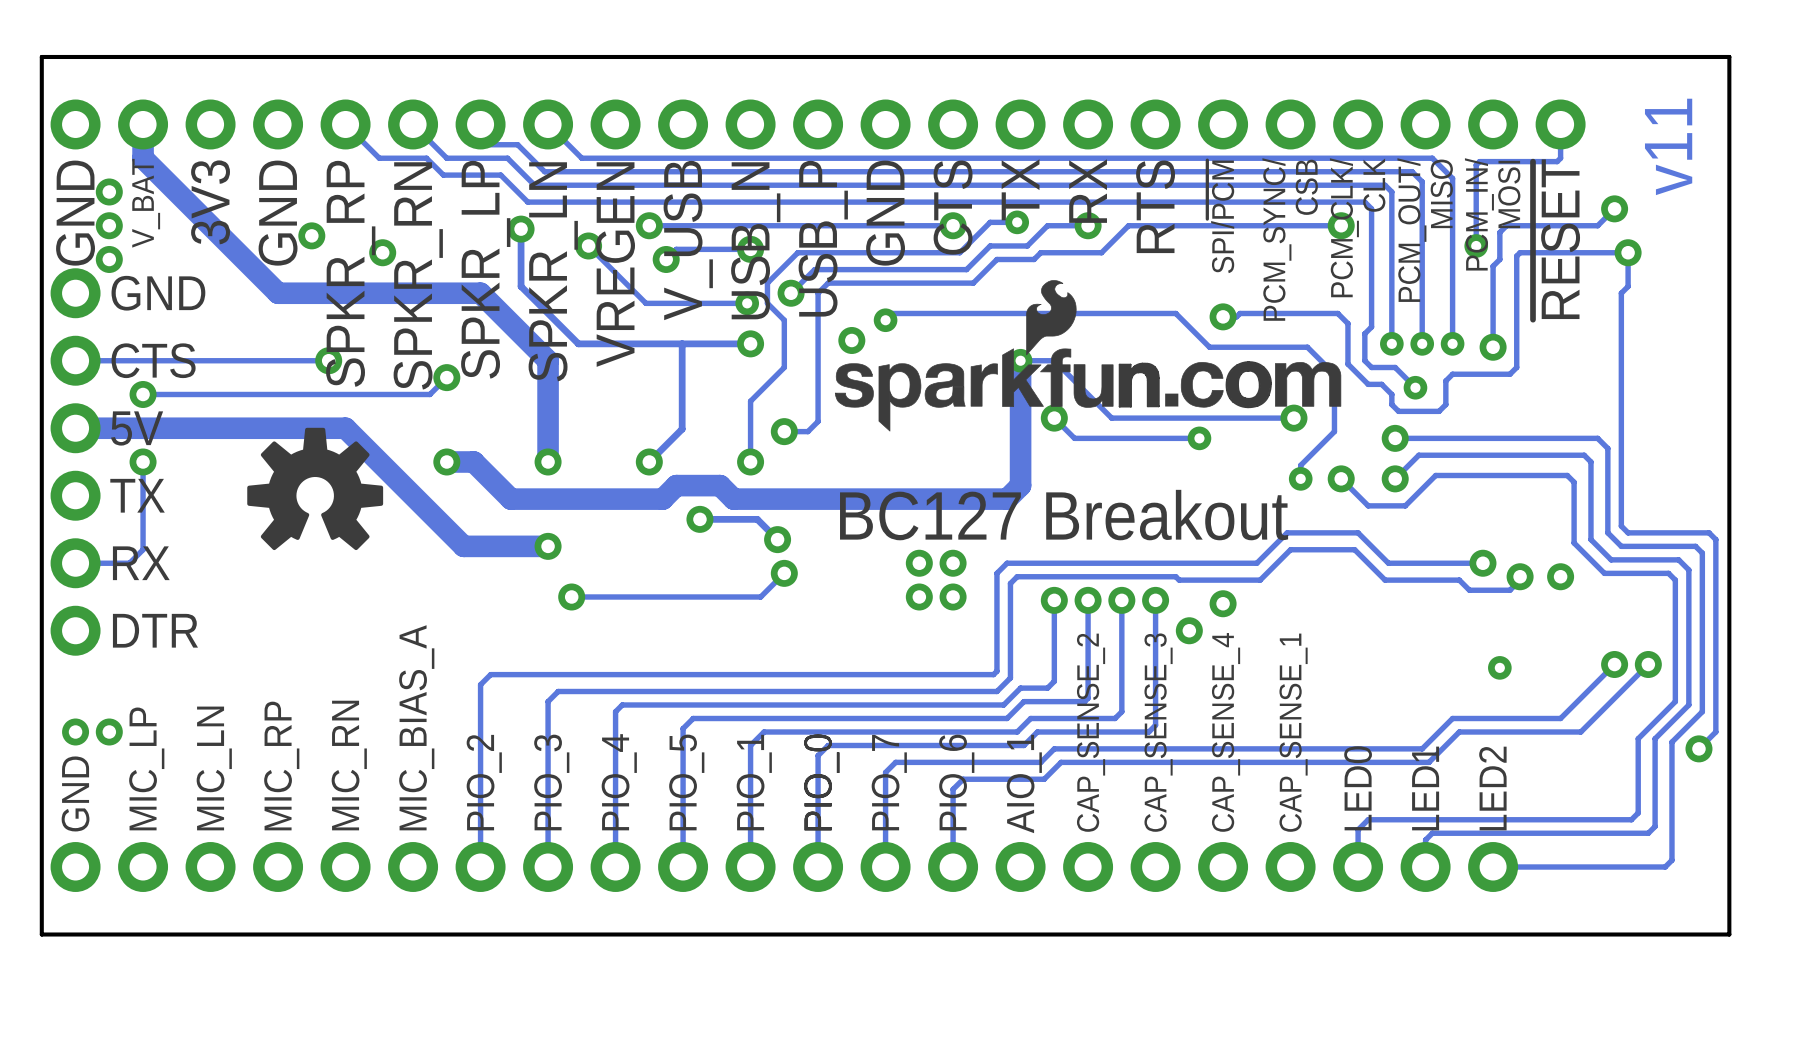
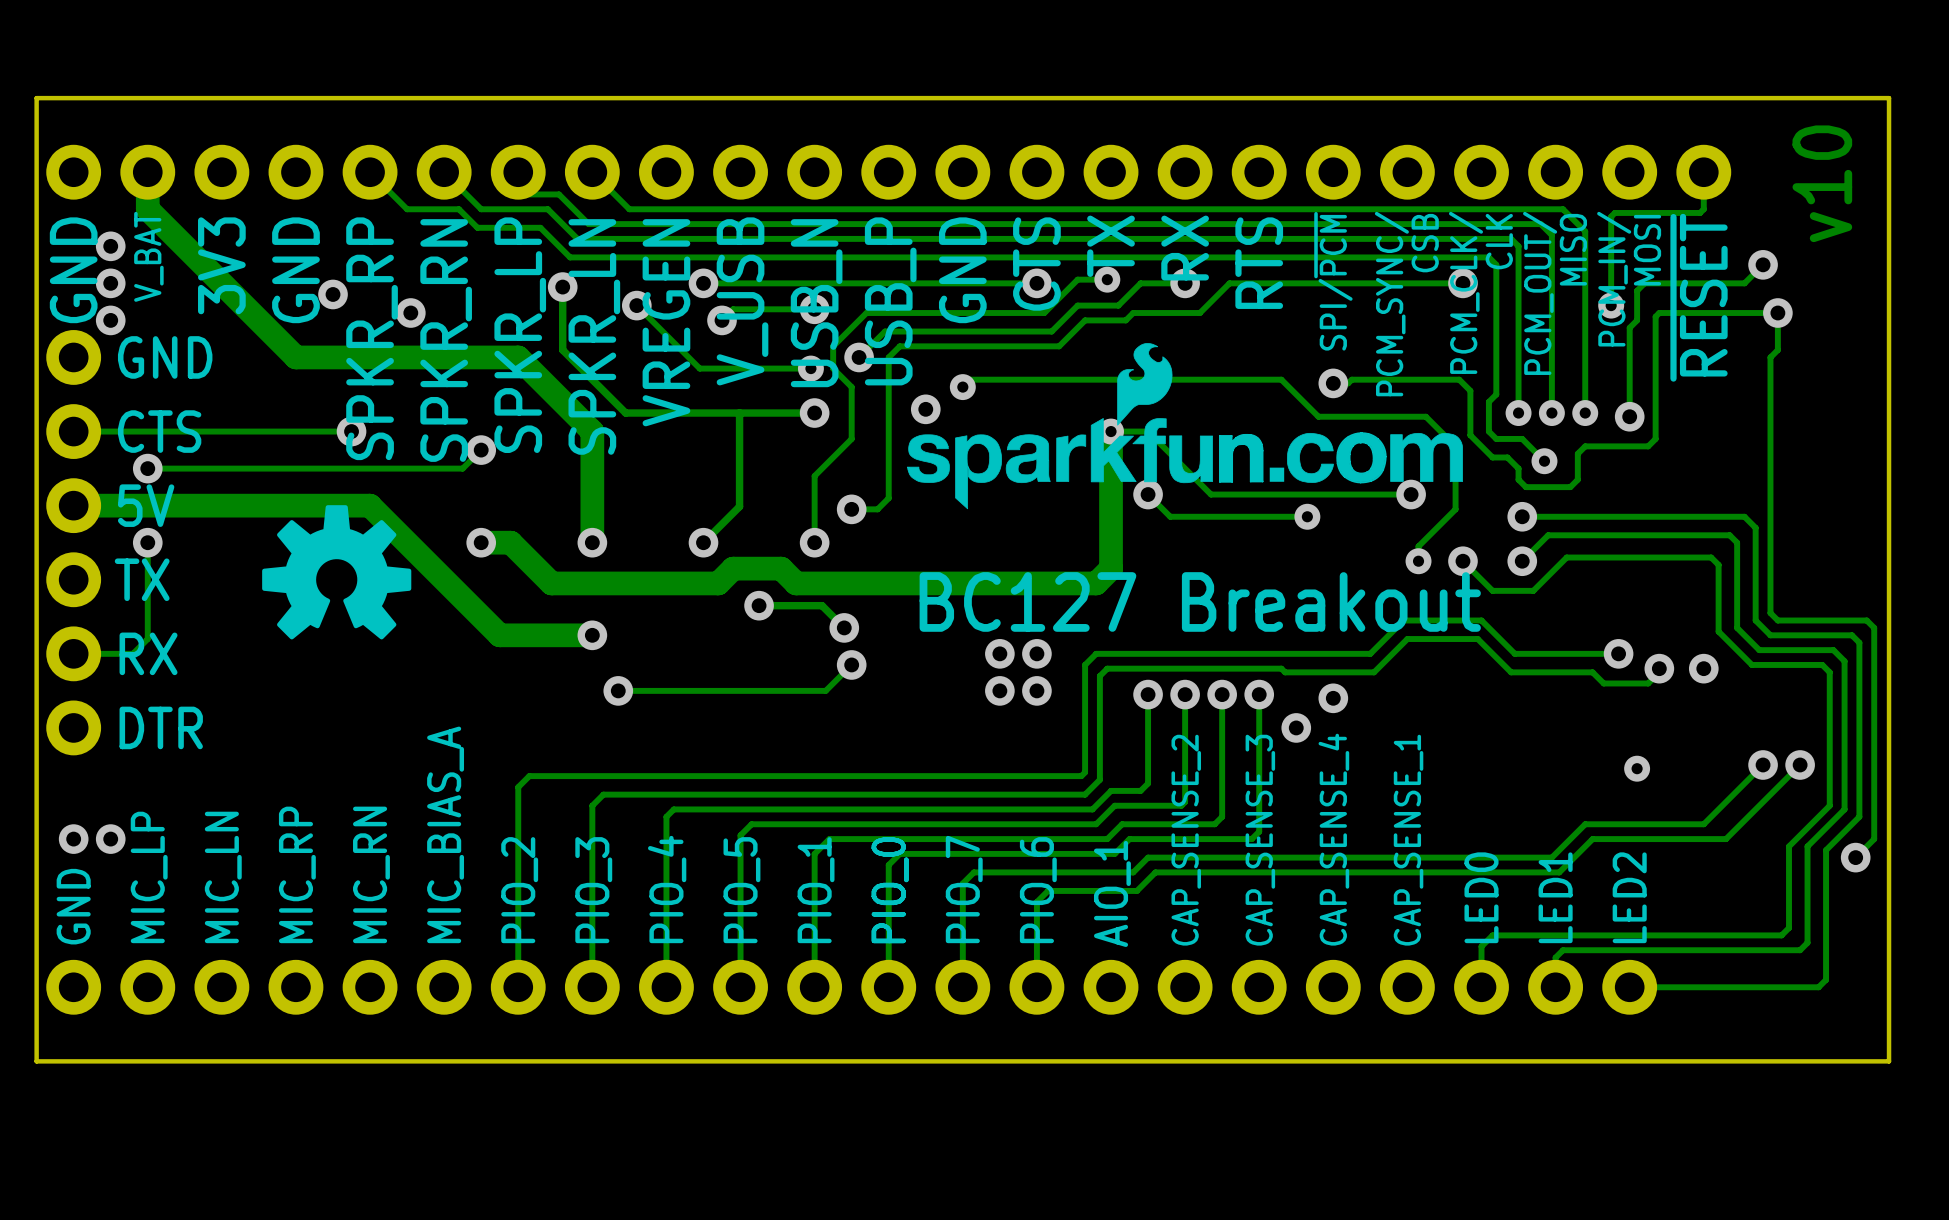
text: v11 (1668, 146) -> v10 (1822, 183)

